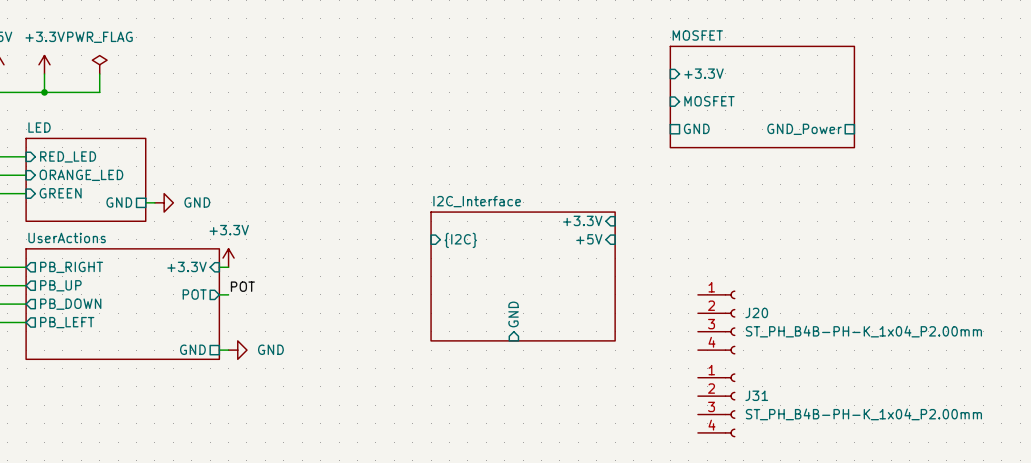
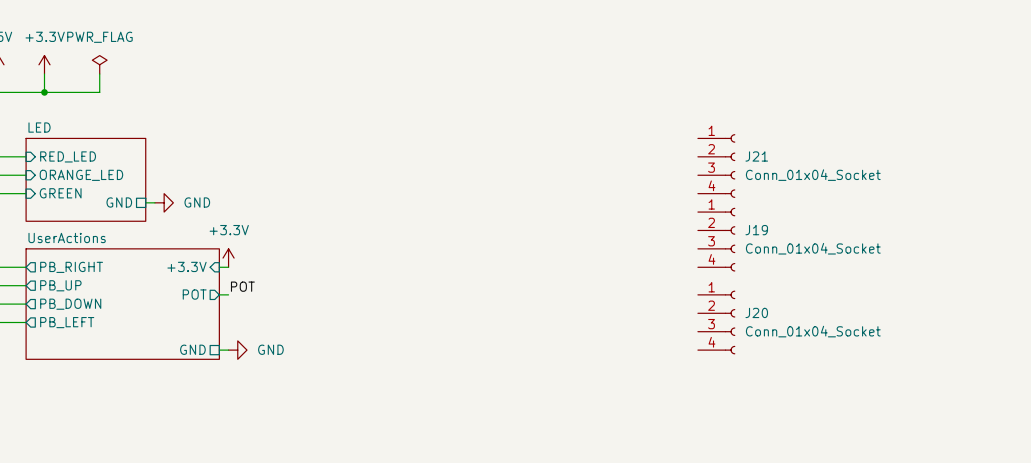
sheet pin: +3.3V (704, 73) -> none
sheet MOSFET: (762, 97) -> none
sheet pin: MOSFET (709, 101) -> none
sheet pin: GND (696, 128) -> none
sheet pin: GND_Power (804, 129) -> none
J21: none -> Conn_01x04_Socket (716, 166)
sheet pin: +3.3V (582, 220) -> none
sheet pin: +5V (589, 239) -> none
J19: none -> Conn_01x04_Socket (716, 239)
sheet pin: {I2C} (460, 240) -> none
sheet I2C_Interface: (523, 276) -> none
sheet pin: GND (513, 314) -> none
J20 value: ST_PH_B4B-PH-K_1x04_P2.00mm (863, 331) -> Conn_01x04_Socket (813, 331)
J31: ST_PH_B4B-PH-K_1x04_P2.00mm (716, 405) -> none

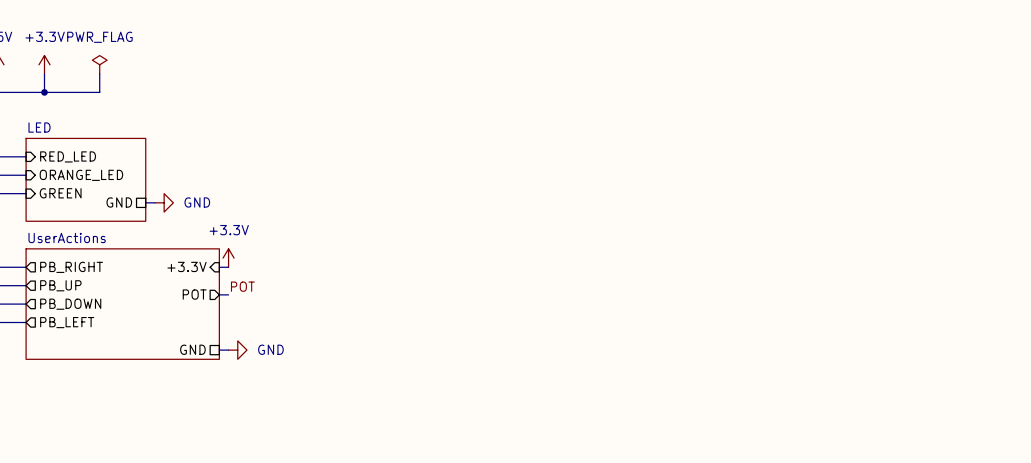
J21: Conn_01x04_Socket (716, 166) -> none
J19: Conn_01x04_Socket (716, 239) -> none
J20: Conn_01x04_Socket (716, 322) -> none

